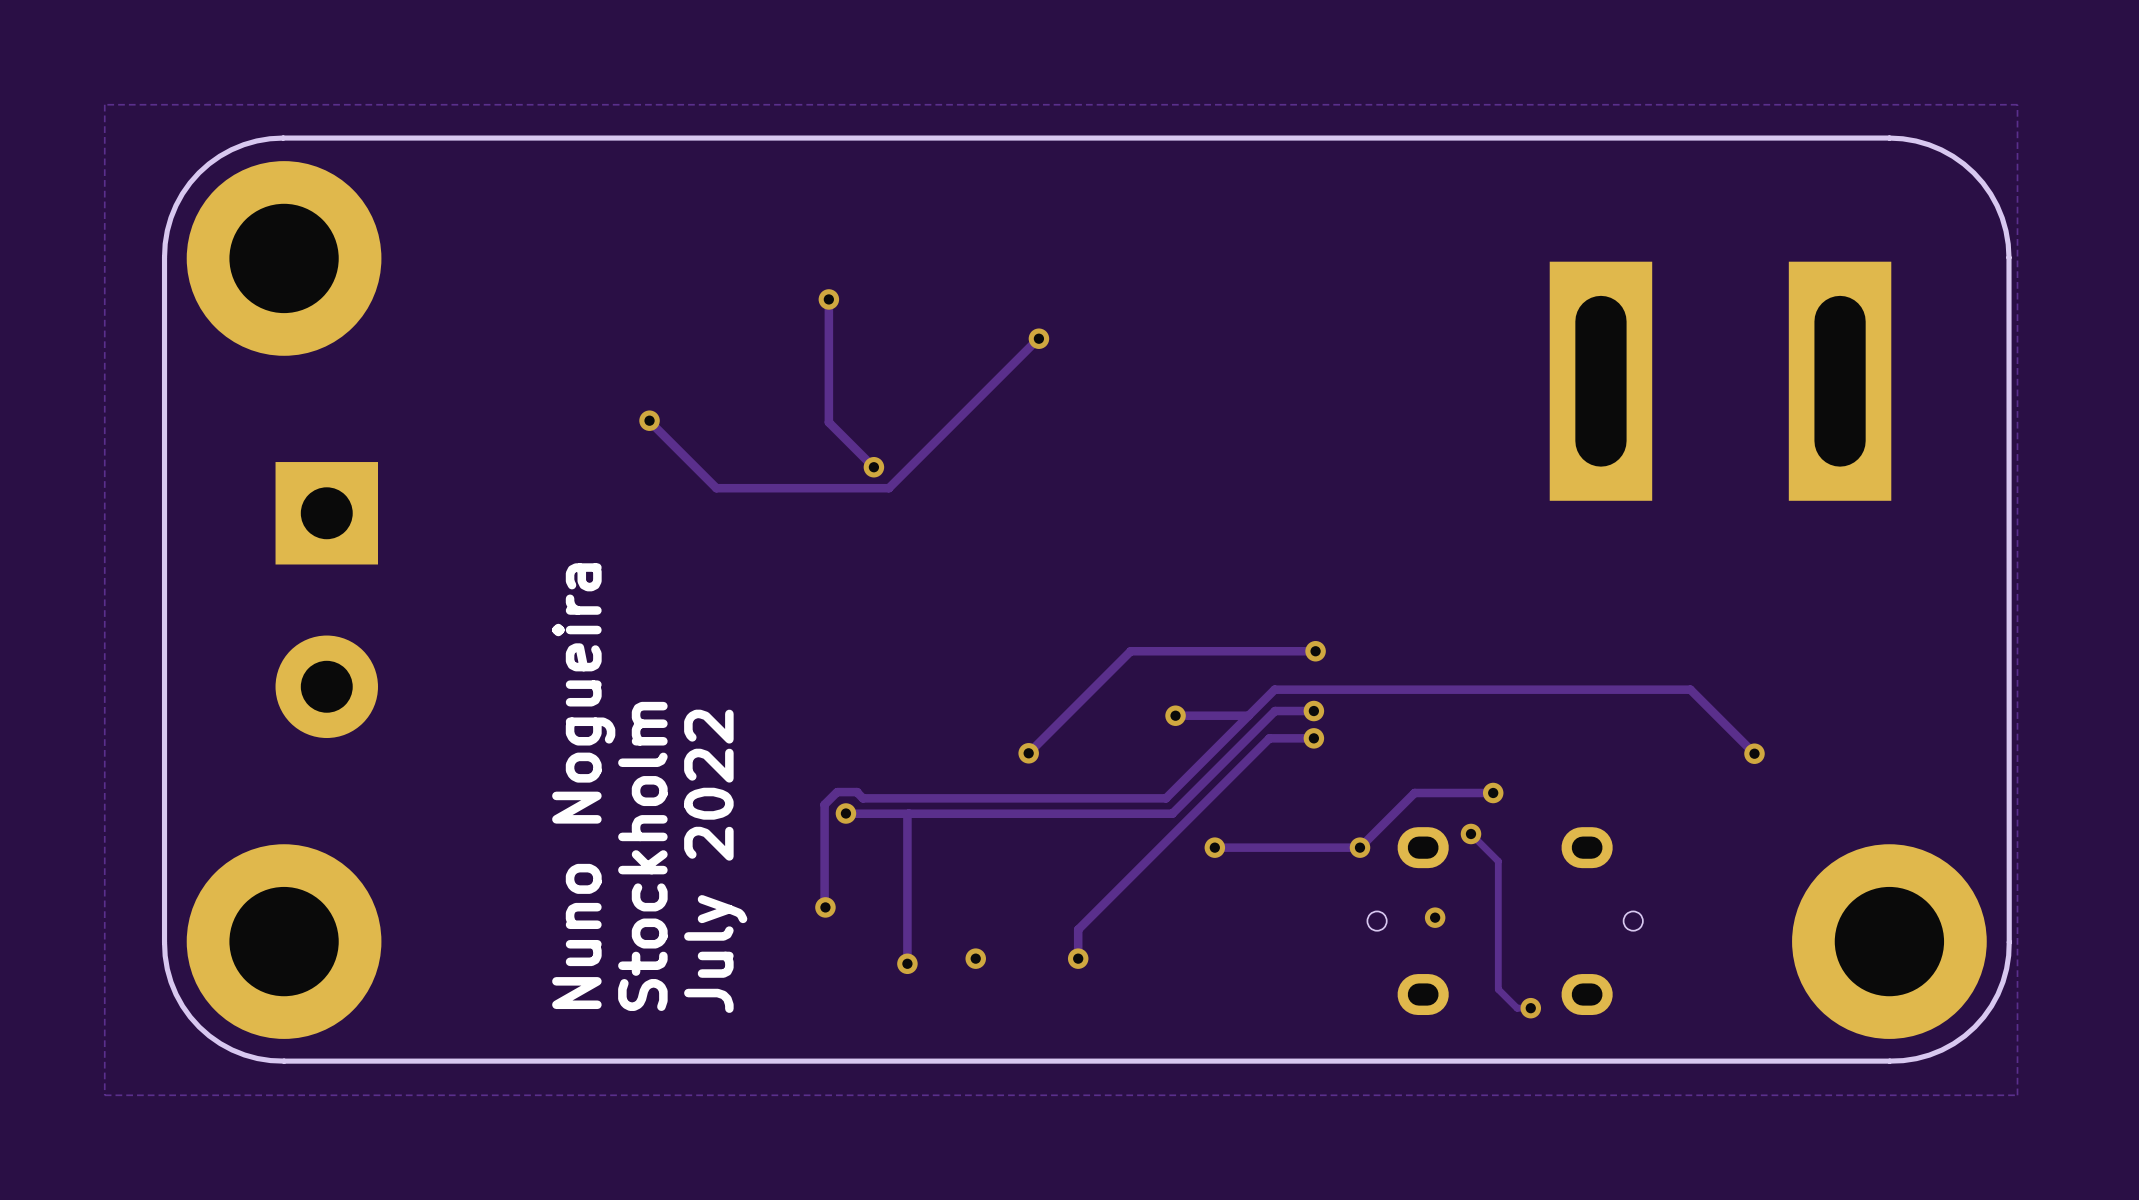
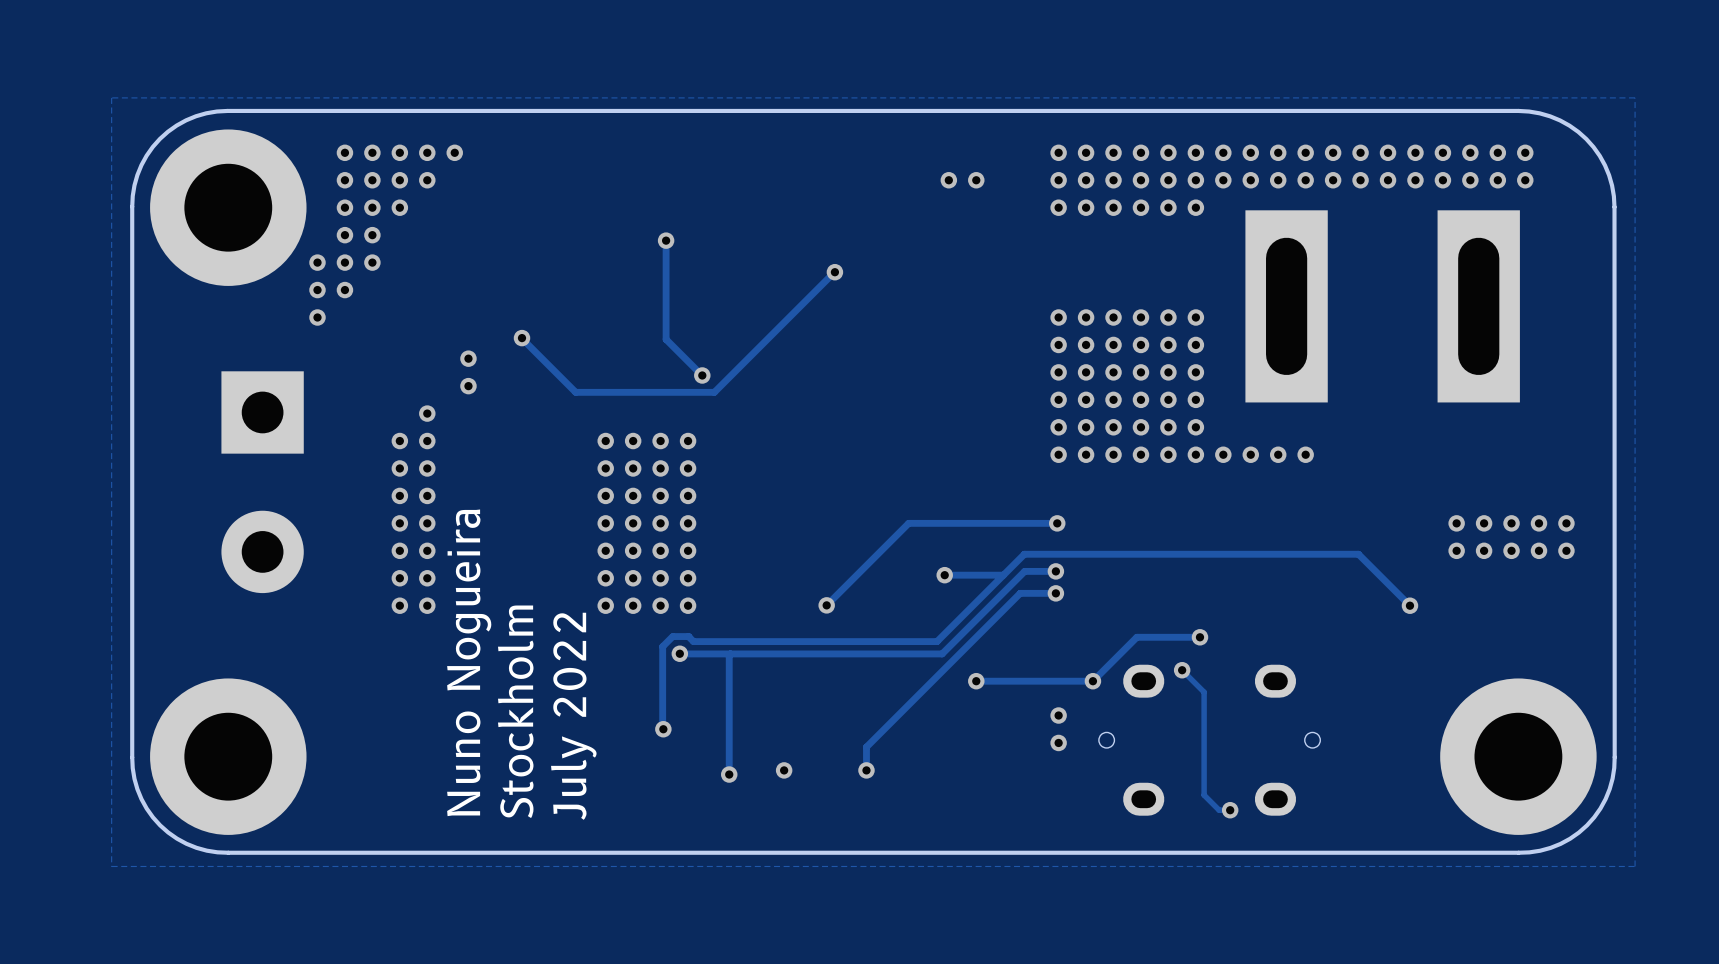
zone outline: (2017, 104) (2017, 1095) (104, 1095) (104, 104) (2017, 104) -> (1635, 97) (1635, 866) (111, 866) (111, 97) (1635, 97)
via: none -> (344, 152)
via: none -> (372, 152)
via: none -> (399, 152)
via: none -> (427, 152)
via: none -> (454, 152)
via: none -> (1058, 152)
via: none -> (1086, 152)
via: none -> (1113, 152)
via: none -> (1140, 152)
via: none -> (1168, 152)
via: none -> (1195, 152)
via: none -> (1223, 152)
via: none -> (1250, 152)
via: none -> (1278, 152)
via: none -> (1305, 152)
via: none -> (1333, 152)
via: none -> (1360, 152)
via: none -> (1388, 152)
via: none -> (1415, 152)
via: none -> (1442, 152)
via: none -> (1470, 152)
via: none -> (1497, 152)
via: none -> (1525, 152)
via: none -> (344, 180)
via: none -> (372, 180)
via: none -> (399, 180)
via: none -> (427, 180)
via: none -> (948, 180)
via: none -> (976, 180)
via: none -> (1058, 180)
via: none -> (1086, 180)
via: none -> (1113, 180)
via: none -> (1140, 180)
via: none -> (1168, 180)
via: none -> (1195, 180)
via: none -> (1223, 180)
via: none -> (1250, 180)
via: none -> (1278, 180)
via: none -> (1305, 180)
via: none -> (1333, 180)
via: none -> (1360, 180)
via: none -> (1388, 180)
via: none -> (1415, 180)
via: none -> (1442, 180)
via: none -> (1470, 180)
via: none -> (1497, 180)
via: none -> (1525, 180)
via: none -> (344, 207)
via: none -> (372, 207)
via: none -> (399, 207)
via: none -> (1058, 207)
via: none -> (1086, 207)
via: none -> (1113, 207)
via: none -> (1140, 207)
via: none -> (1168, 207)
via: none -> (1195, 207)
via: none -> (344, 235)
via: none -> (372, 235)
via: none -> (317, 262)
via: none -> (344, 262)
via: none -> (372, 262)
via: none -> (317, 290)
via: none -> (344, 290)
via: none -> (317, 317)
via: none -> (1058, 317)
via: none -> (1086, 317)
via: none -> (1113, 317)
via: none -> (1140, 317)
via: none -> (1168, 317)
via: none -> (1195, 317)
via: none -> (1058, 344)
via: none -> (1086, 344)
via: none -> (1113, 344)
via: none -> (1140, 344)
via: none -> (1168, 344)
via: none -> (1195, 344)
via: none -> (468, 358)
via: none -> (1058, 372)
via: none -> (1086, 372)
via: none -> (1113, 372)
via: none -> (1140, 372)
via: none -> (1168, 372)
via: none -> (1195, 372)
via: none -> (468, 386)
via: none -> (1058, 399)
via: none -> (1086, 399)
via: none -> (1113, 399)
via: none -> (1140, 399)
via: none -> (1168, 399)
via: none -> (1195, 399)
via: none -> (427, 413)
via: none -> (1058, 427)
via: none -> (1086, 427)
via: none -> (1113, 427)
via: none -> (1140, 427)
via: none -> (1168, 427)
via: none -> (1195, 427)
via: none -> (399, 441)
via: none -> (427, 441)
via: none -> (605, 441)
via: none -> (633, 441)
via: none -> (660, 441)
via: none -> (688, 441)
via: none -> (1058, 454)
via: none -> (1086, 454)
via: none -> (1113, 454)
via: none -> (1140, 454)
via: none -> (1168, 454)
via: none -> (1195, 454)
via: none -> (1223, 454)
via: none -> (1250, 454)
via: none -> (1278, 454)
via: none -> (1305, 454)
via: none -> (399, 468)
via: none -> (427, 468)
via: none -> (605, 468)
via: none -> (633, 468)
via: none -> (660, 468)
via: none -> (688, 468)
via: none -> (399, 495)
via: none -> (427, 495)
via: none -> (605, 495)
via: none -> (633, 495)
via: none -> (660, 495)
via: none -> (688, 495)
via: none -> (399, 523)
via: none -> (427, 523)
via: none -> (605, 523)
via: none -> (633, 523)
via: none -> (660, 523)
via: none -> (688, 523)
via: none -> (1456, 523)
via: none -> (1484, 523)
via: none -> (1511, 523)
via: none -> (1538, 523)
via: none -> (1566, 523)
via: none -> (399, 550)
via: none -> (427, 550)
via: none -> (605, 550)
via: none -> (633, 550)
via: none -> (660, 550)
via: none -> (688, 550)
via: none -> (1456, 550)
via: none -> (1484, 550)
via: none -> (1511, 550)
via: none -> (1538, 550)
via: none -> (1566, 550)
via: none -> (399, 578)
via: none -> (427, 578)
via: none -> (605, 578)
via: none -> (633, 578)
via: none -> (660, 578)
via: none -> (688, 578)
via: none -> (399, 605)
via: none -> (427, 605)
via: none -> (605, 605)
via: none -> (633, 605)
via: none -> (660, 605)
via: none -> (688, 605)
via: none -> (1058, 715)
via: (1435, 917) -> none
via: none -> (1058, 742)

